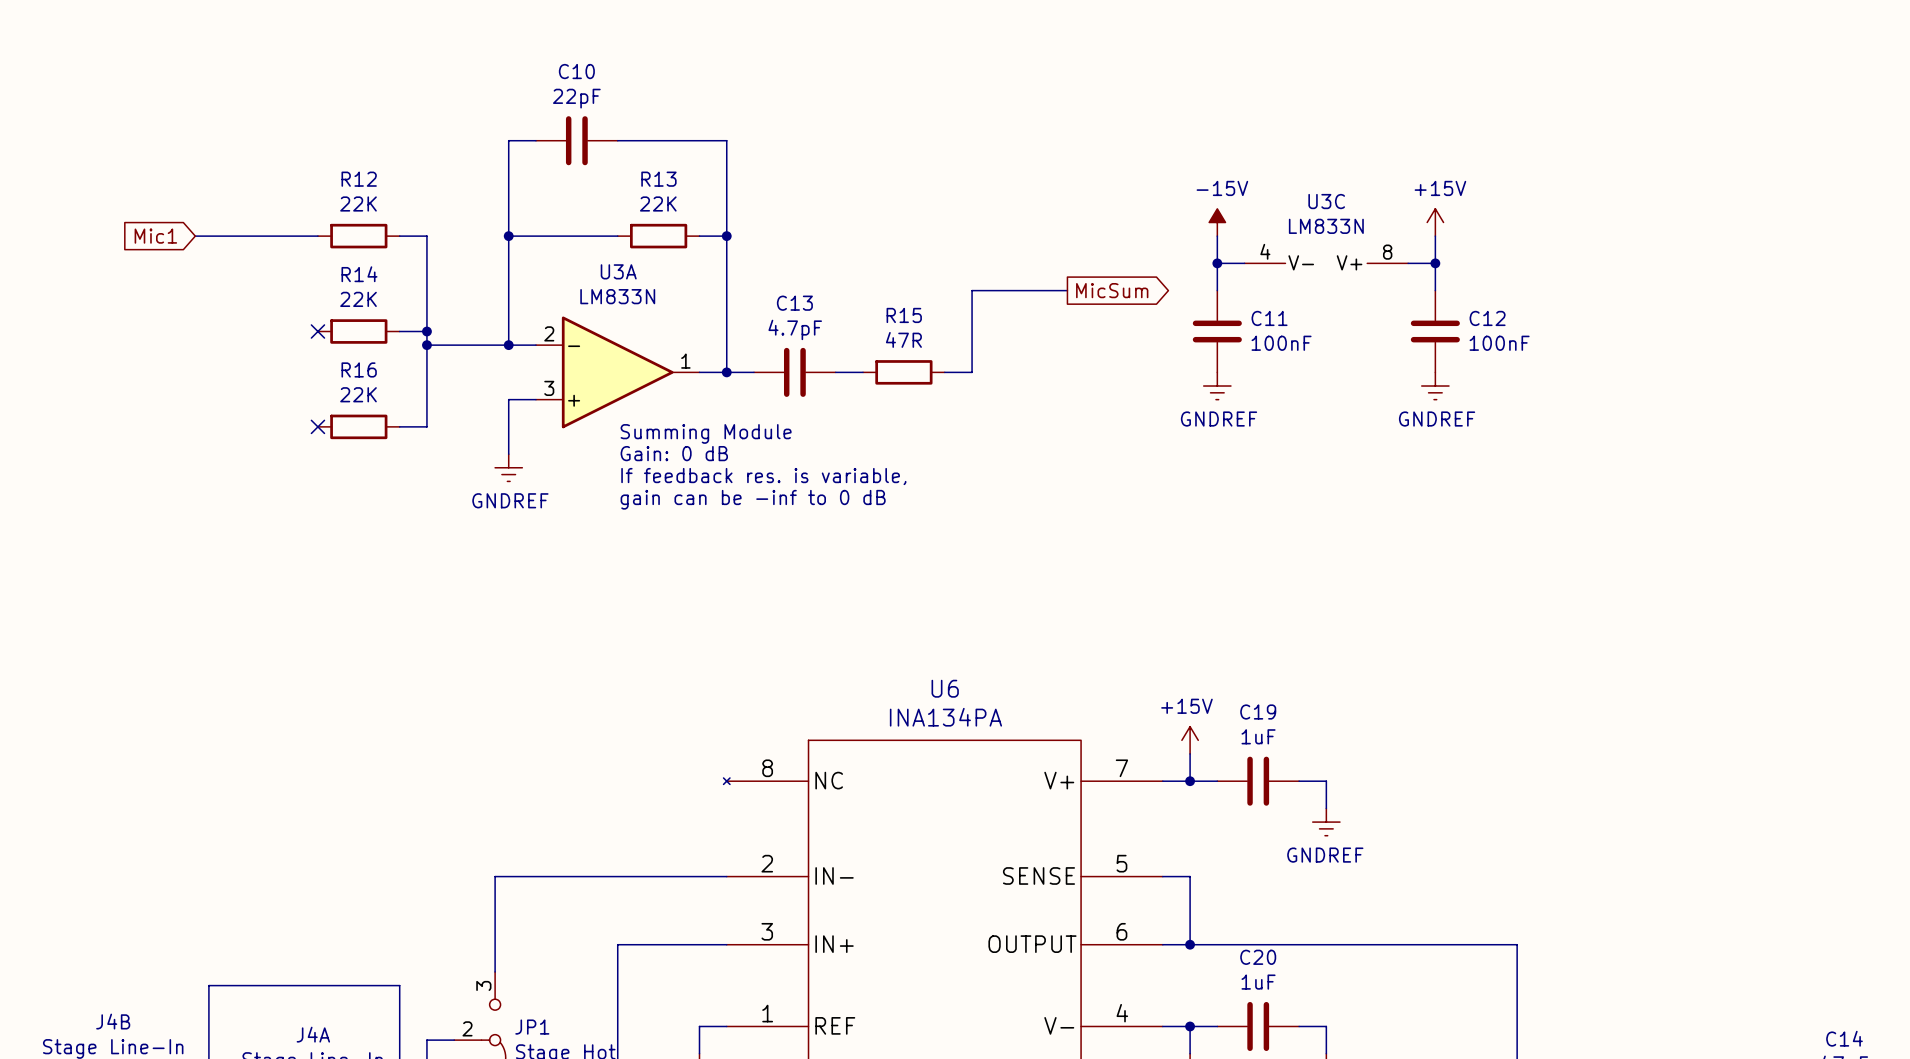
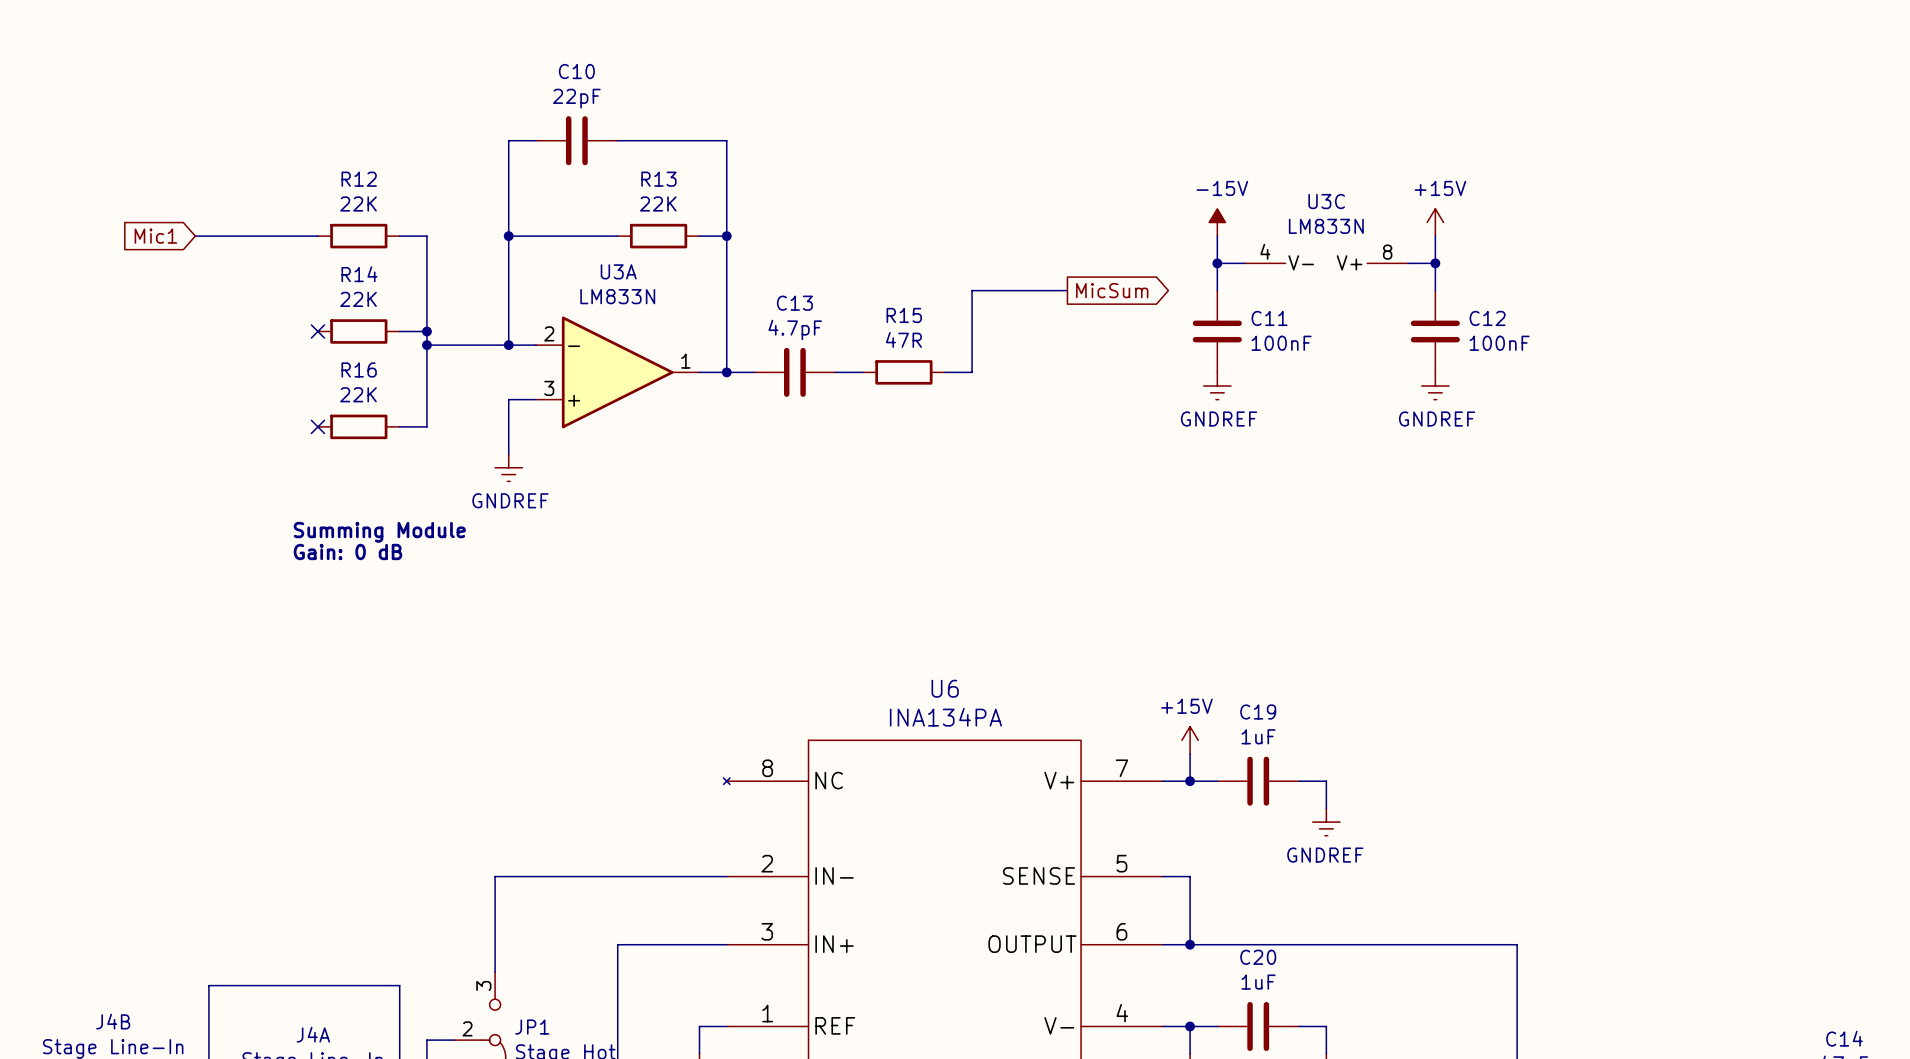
text: Summing Module (706, 433) -> none
text: Gain: 0 dB (674, 453) -> none
text: If feedback res. is variable, (763, 476) -> none
text: gain can be -inf to 0 dB (753, 499) -> none
text: none -> Summing Module (379, 532)
text: none -> Gain: 0 dB (347, 552)

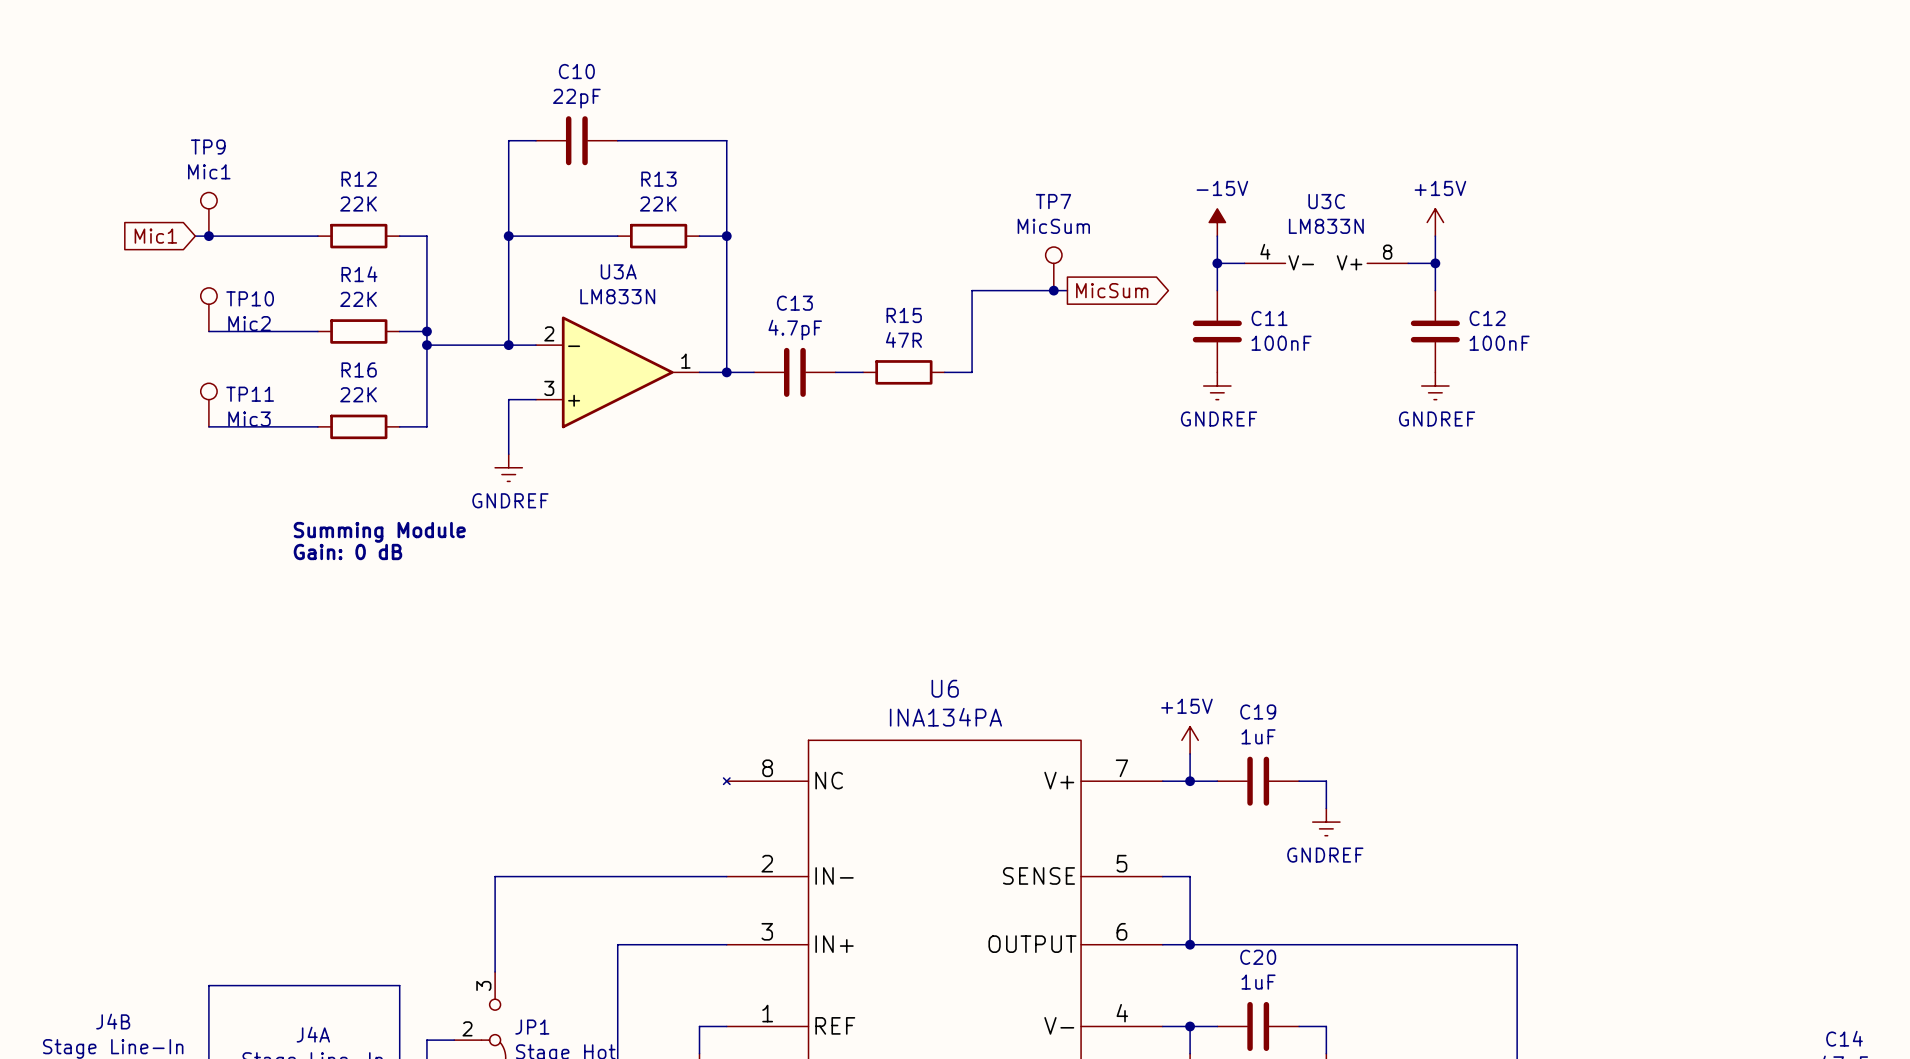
TP9: none -> Mic1 (208, 214)
junction: none -> (208, 236)
TP7: none -> MicSum (1053, 268)
junction: none -> (1053, 290)
TP10: none -> Mic2 (208, 309)
wire: none -> (208, 331) (317, 331)
no-connect mark: (317, 331) -> none
TP11: none -> Mic3 (208, 405)
wire: none -> (208, 426) (317, 426)
no-connect mark: (317, 426) -> none

